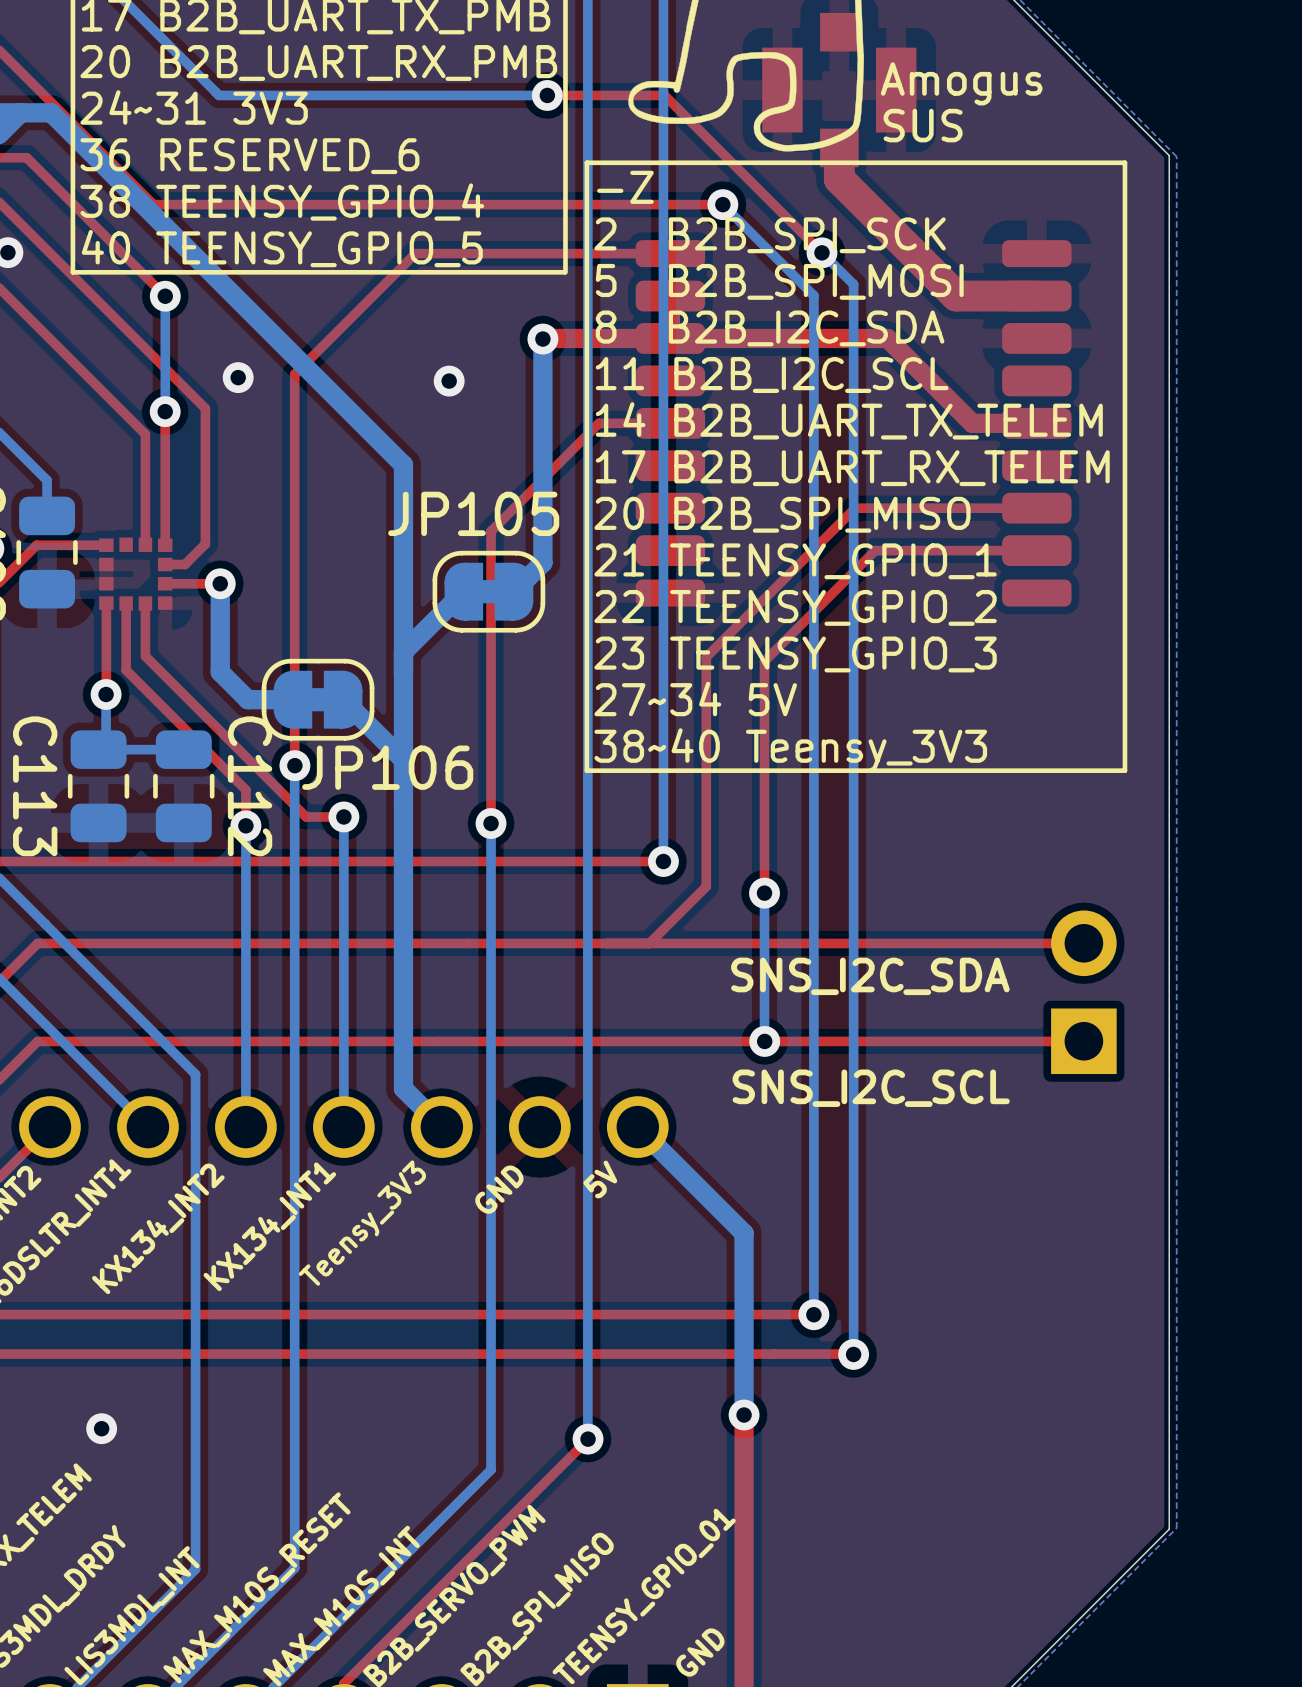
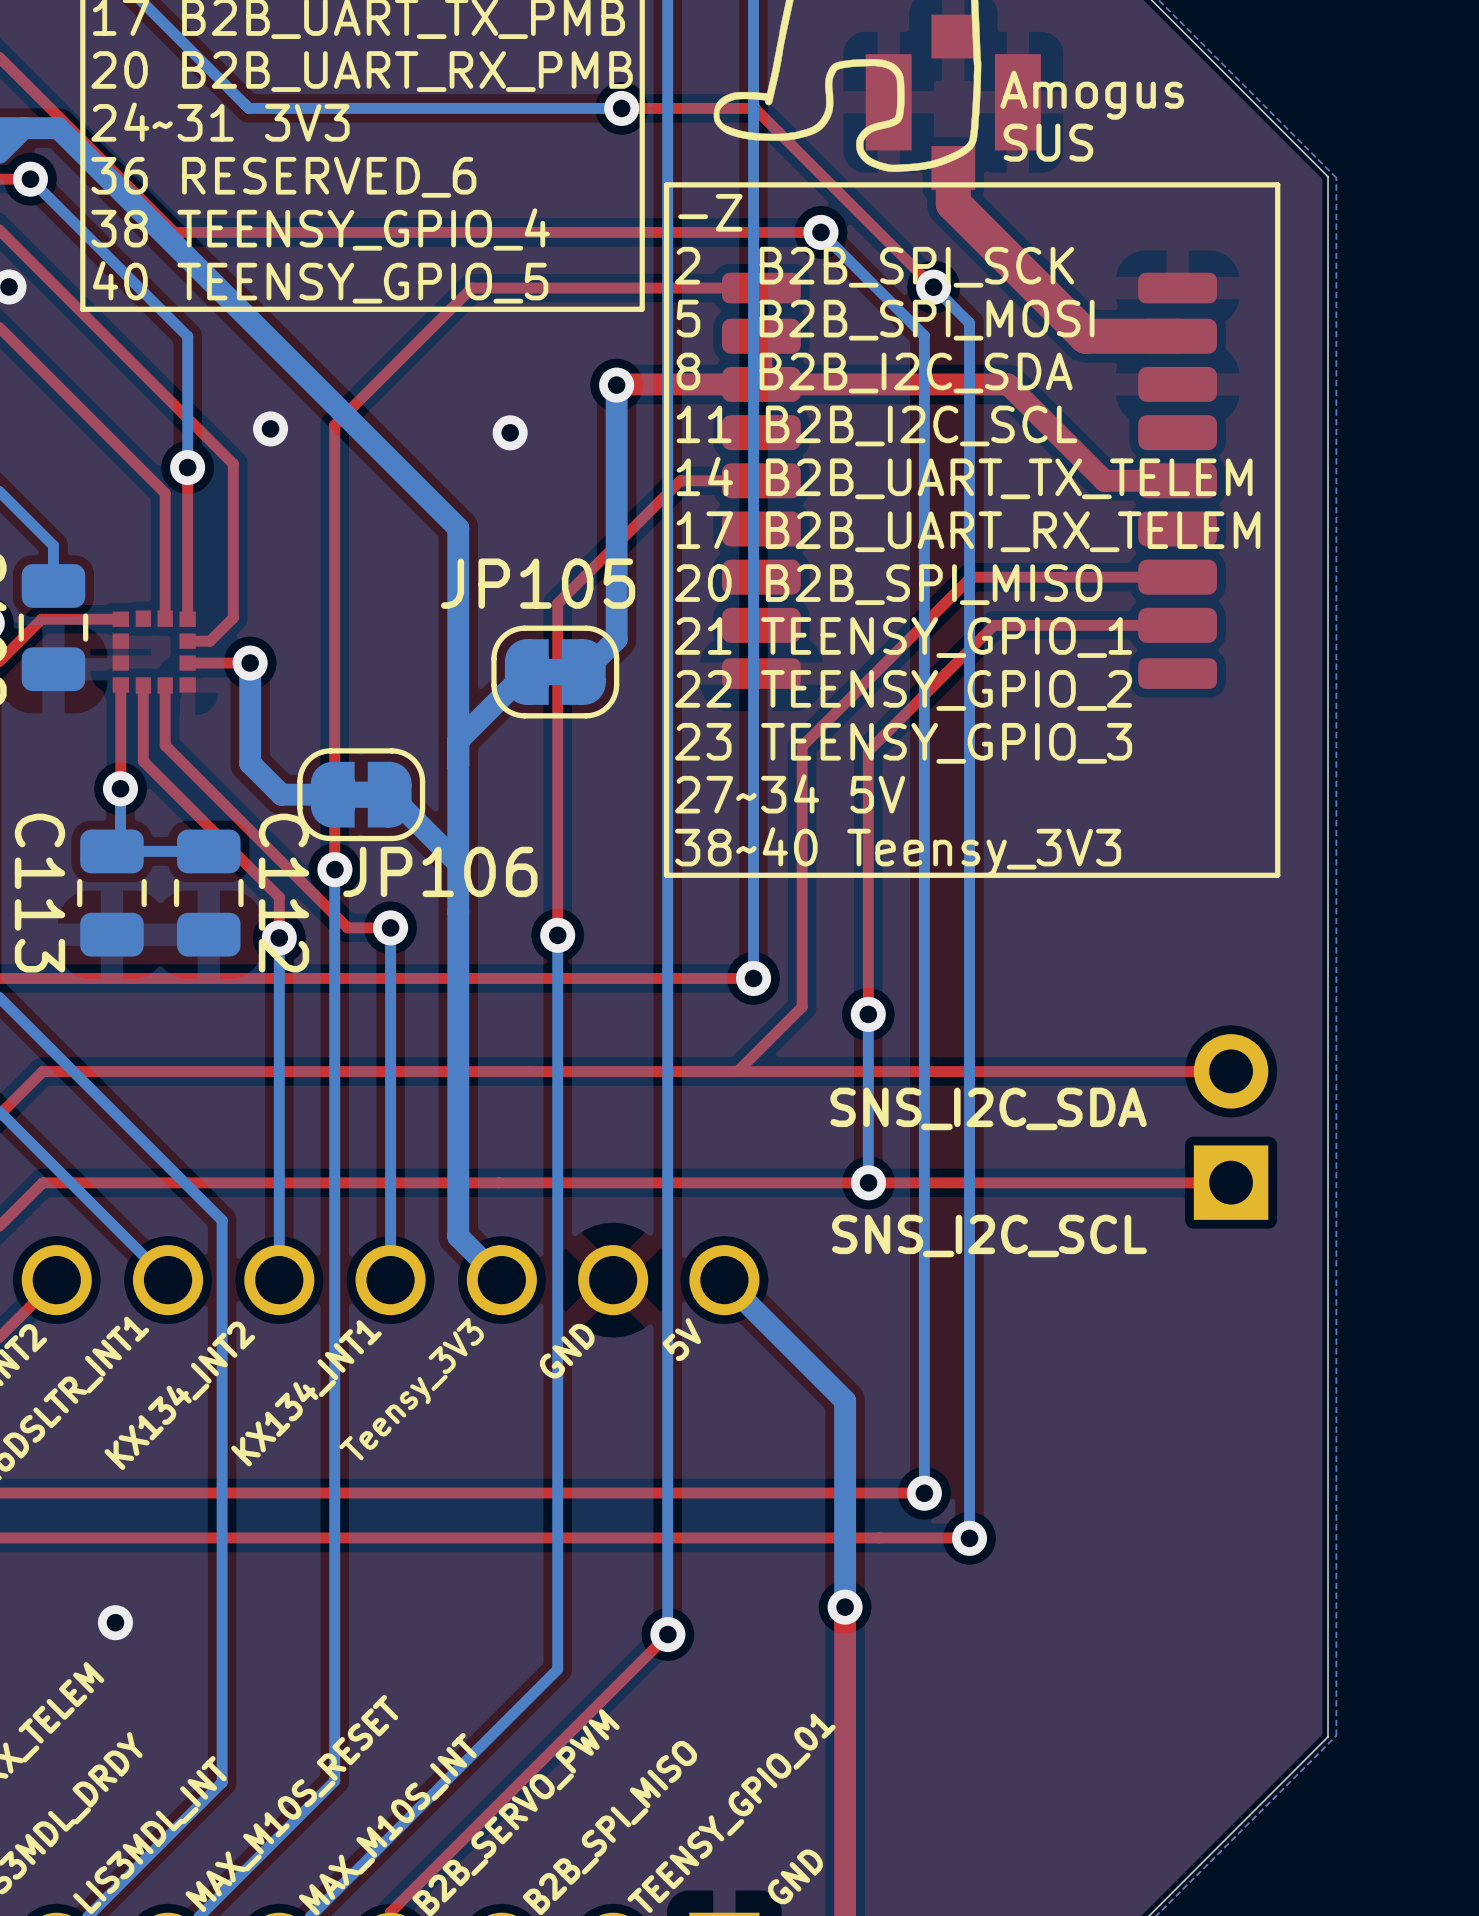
top track: (26, 157) (165, 296) -> none
bottom track: none -> (30, 179) (187, 336)
via position: (165, 296) -> (30, 179)

